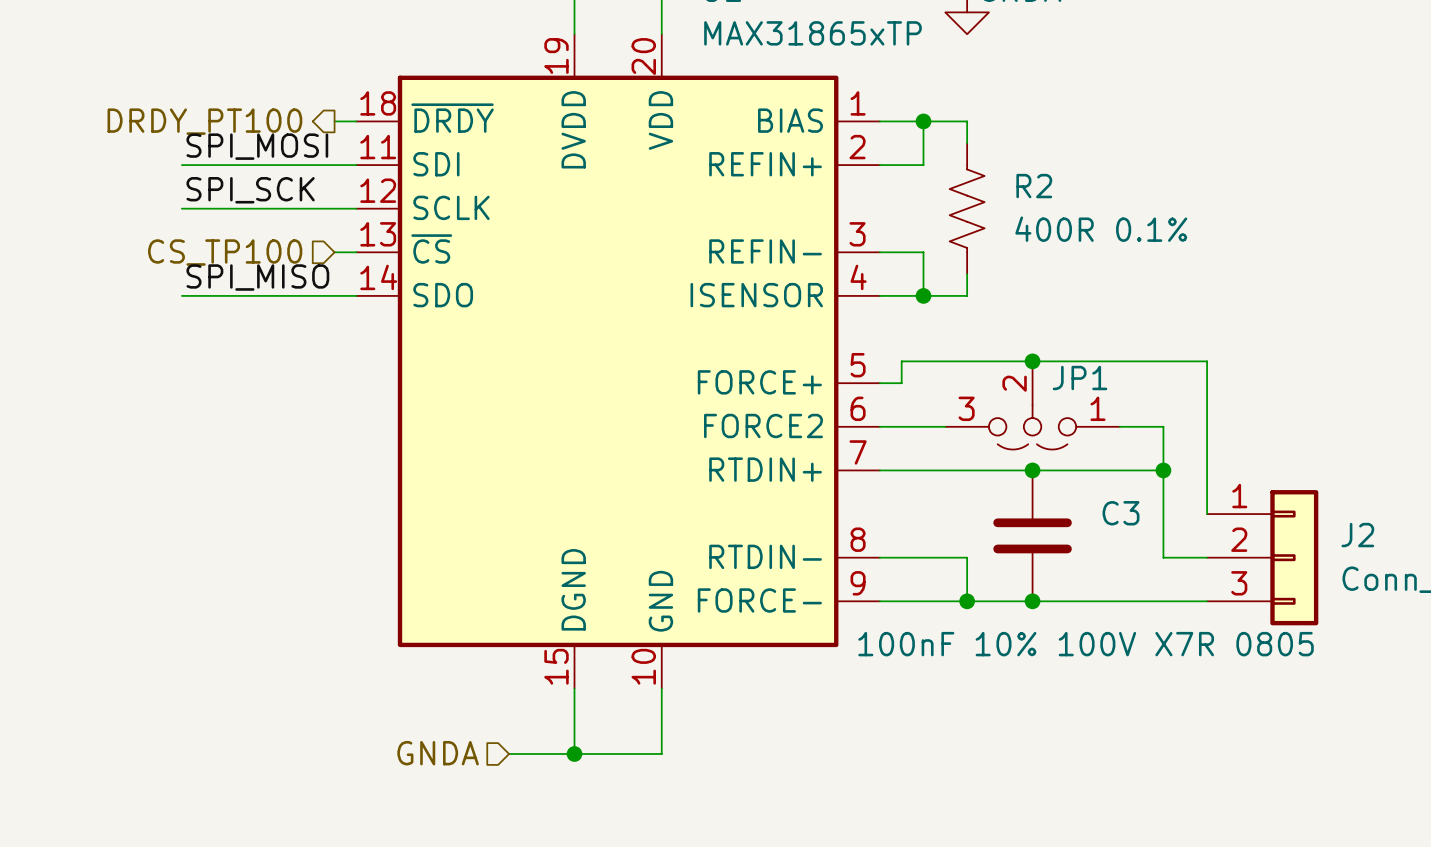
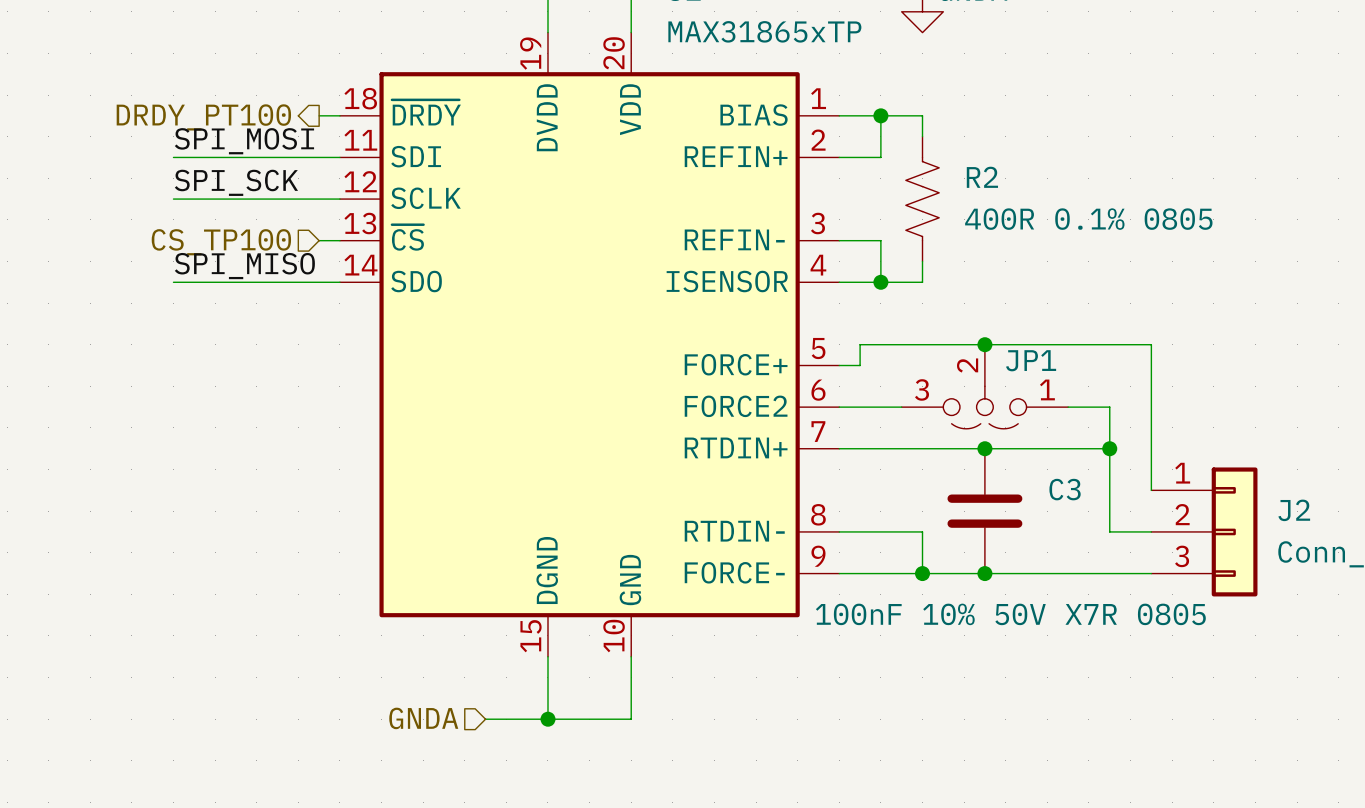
R2 value: 400R 0.1% (1101, 229) -> 400R 0.1% 0805 (1088, 219)
C3 value: 100nF 10% 100V X7R 0805 (1086, 644) -> 100nF 10% 50V X7R 0805 (1010, 614)

